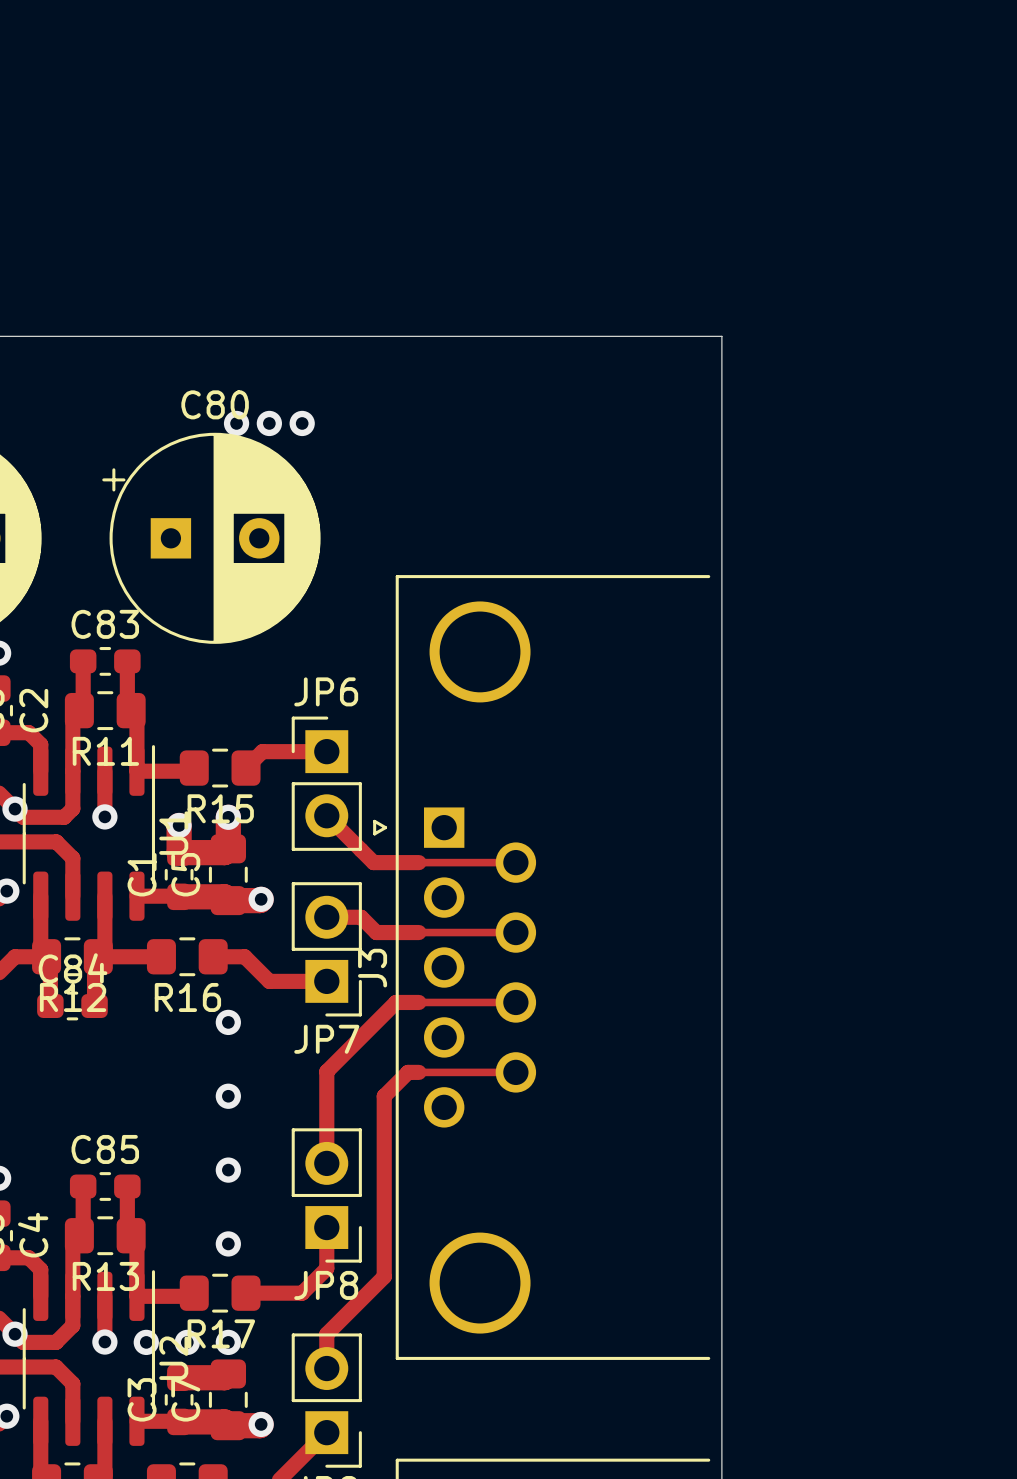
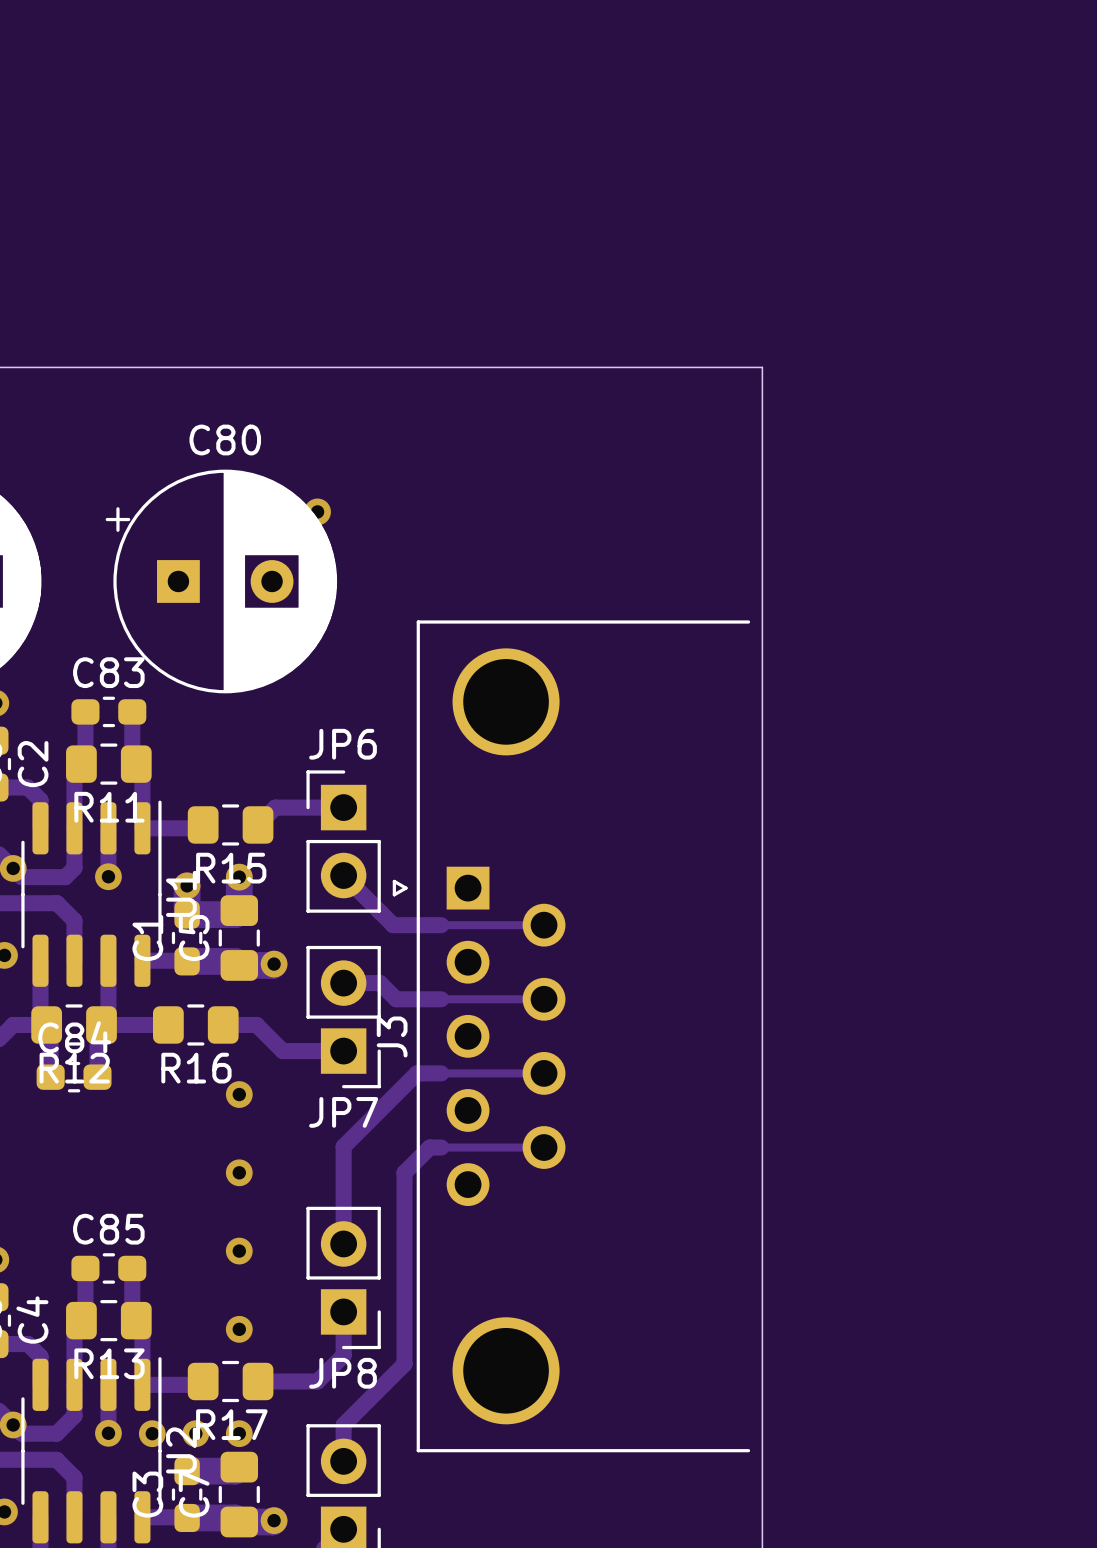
via: (236, 423) -> none
via: (269, 423) -> none
via: (302, 423) -> none
via: none -> (317, 511)

